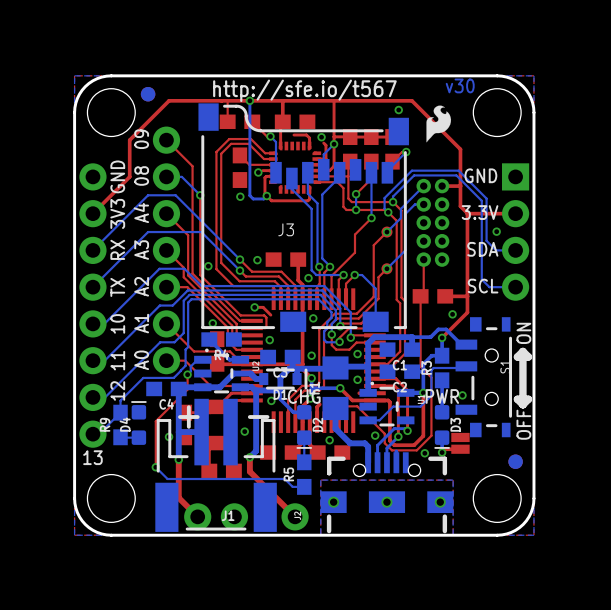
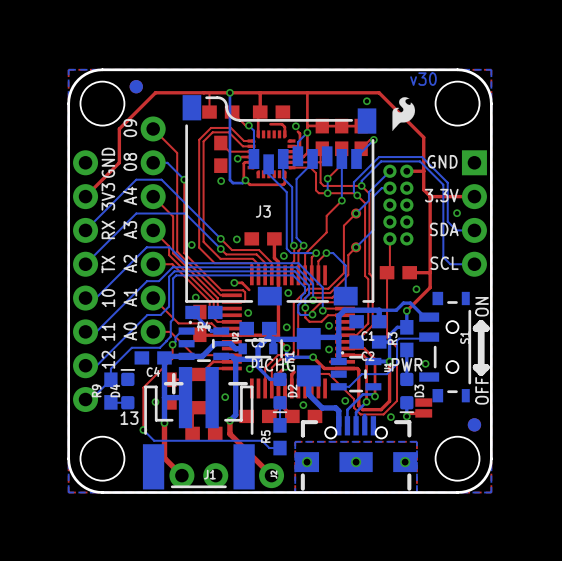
text: http://sfe.io/t567 (304, 90) -> none
text position: 13 (92, 457) -> 13 (129, 418)

